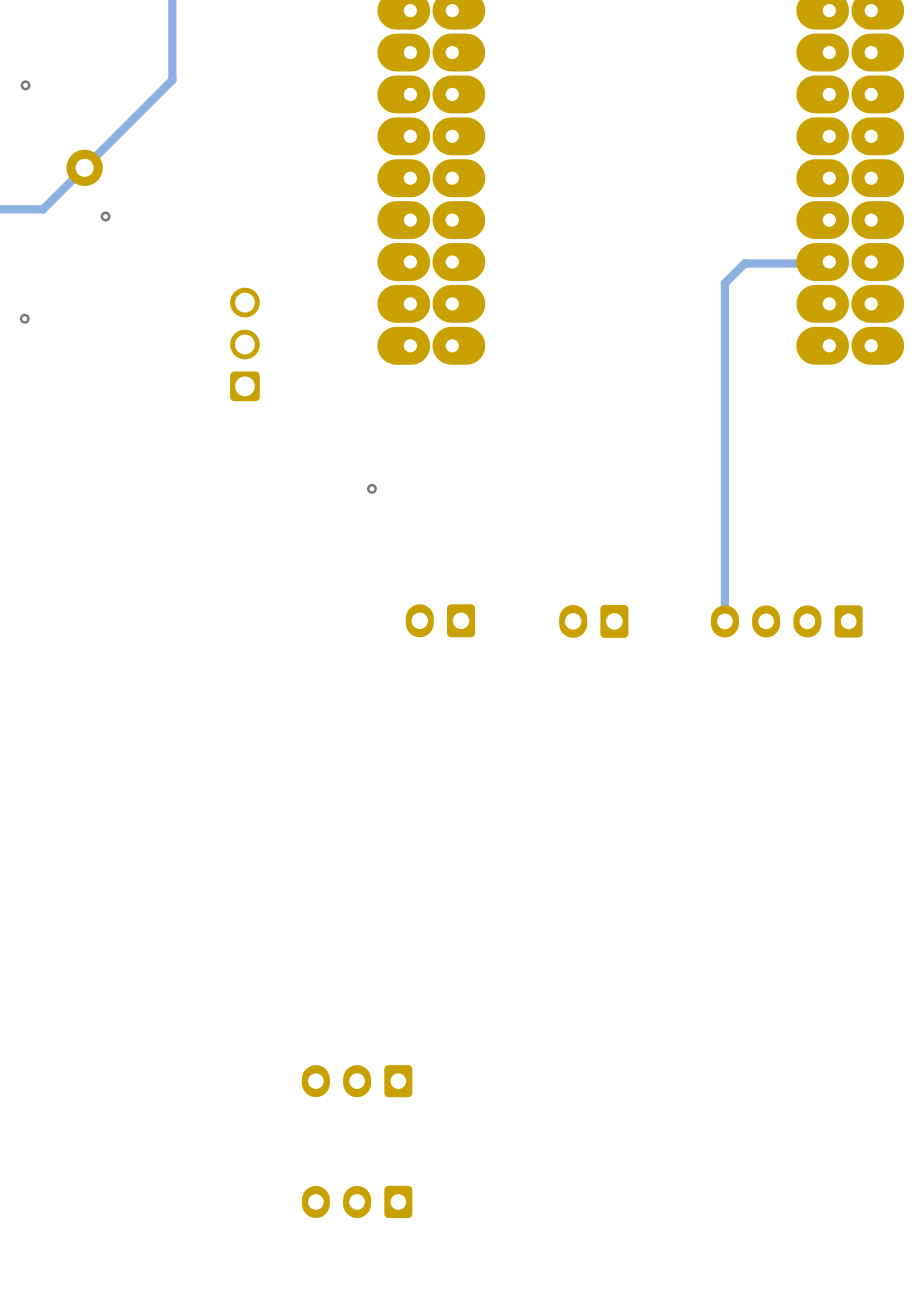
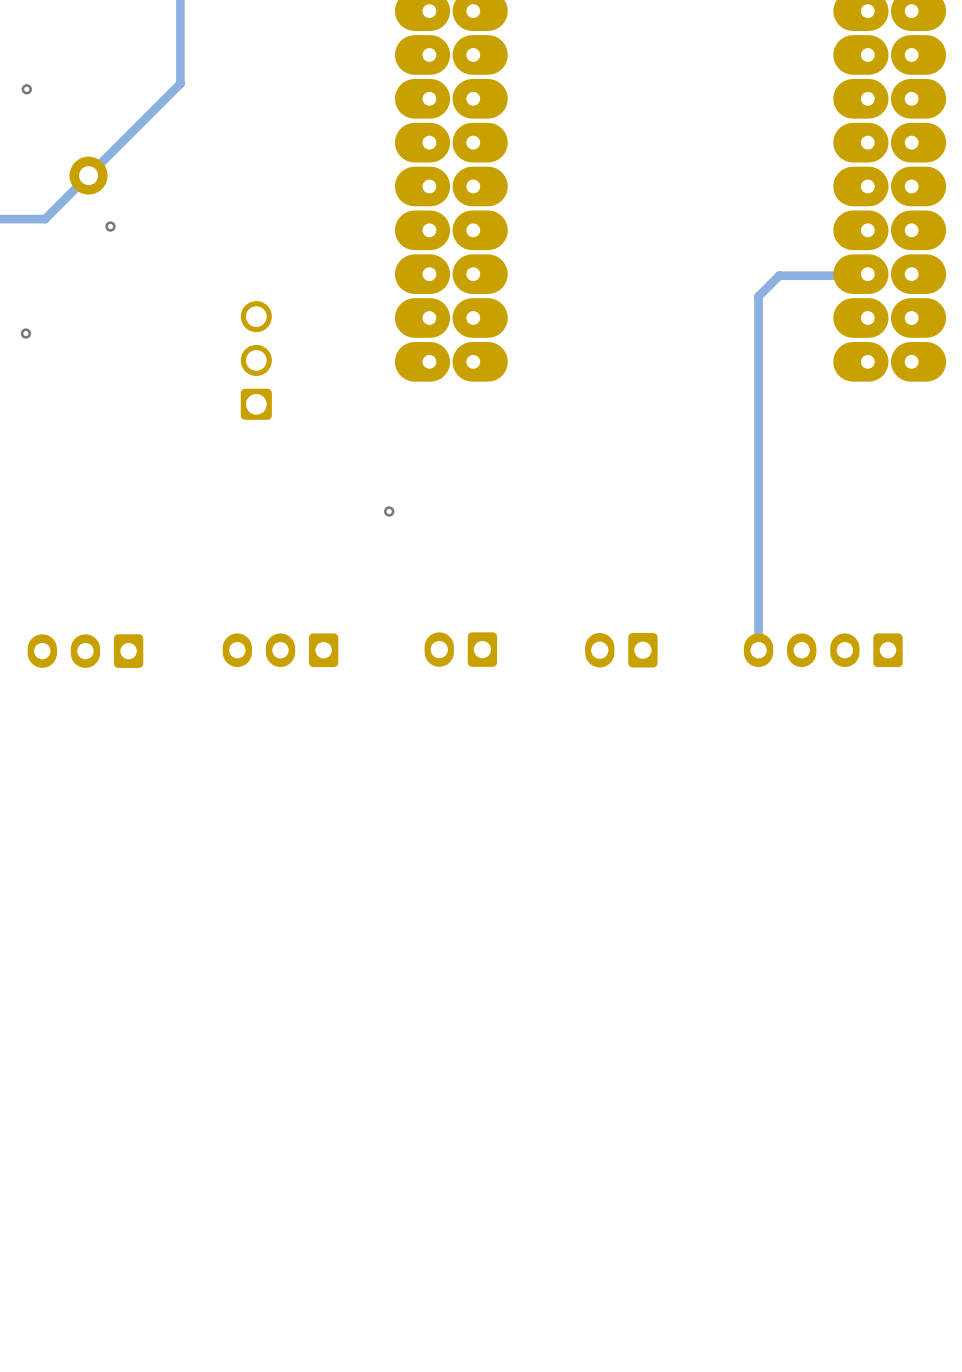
part: none -> (280, 650)
part: none -> (85, 651)
part: (357, 1081) -> none
part: (357, 1201) -> none

